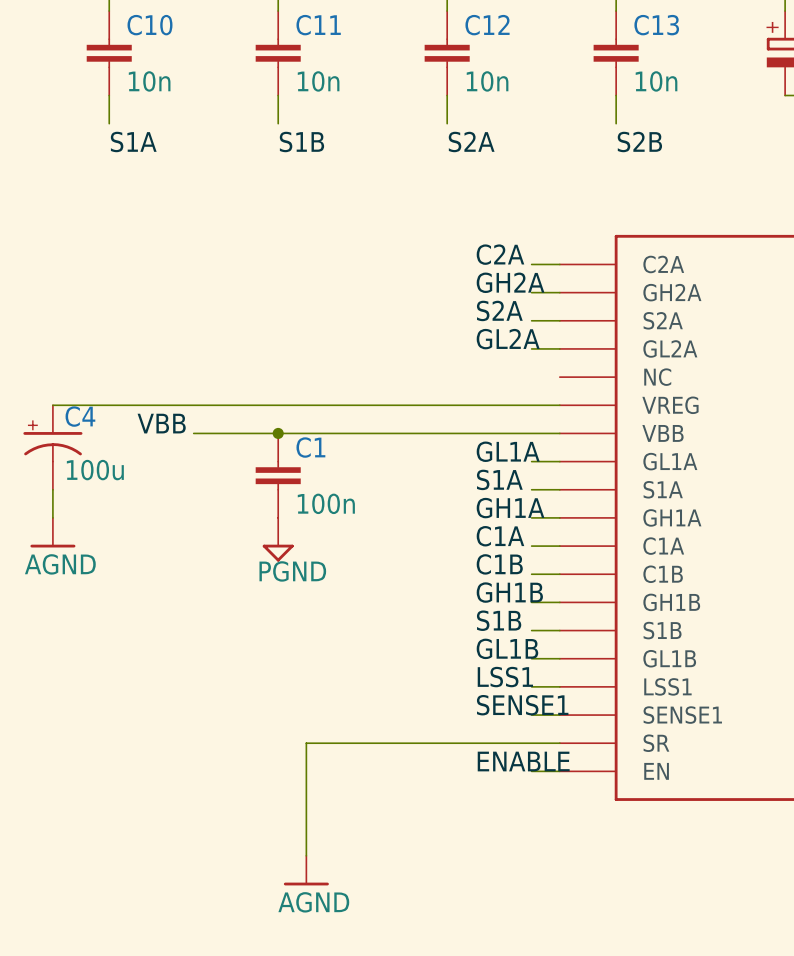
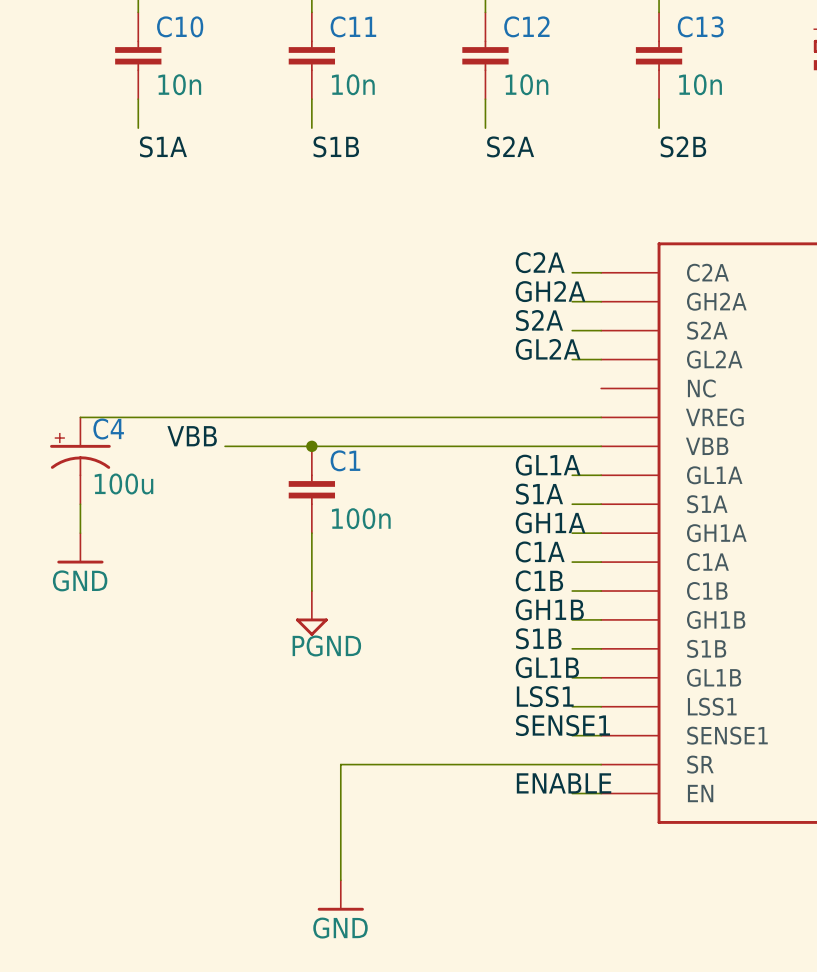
power symbol: AGND (52, 532) -> GND (80, 548)
power symbol position: PGND (278, 539) -> PGND (311, 613)
power symbol: AGND (306, 870) -> GND (340, 895)

